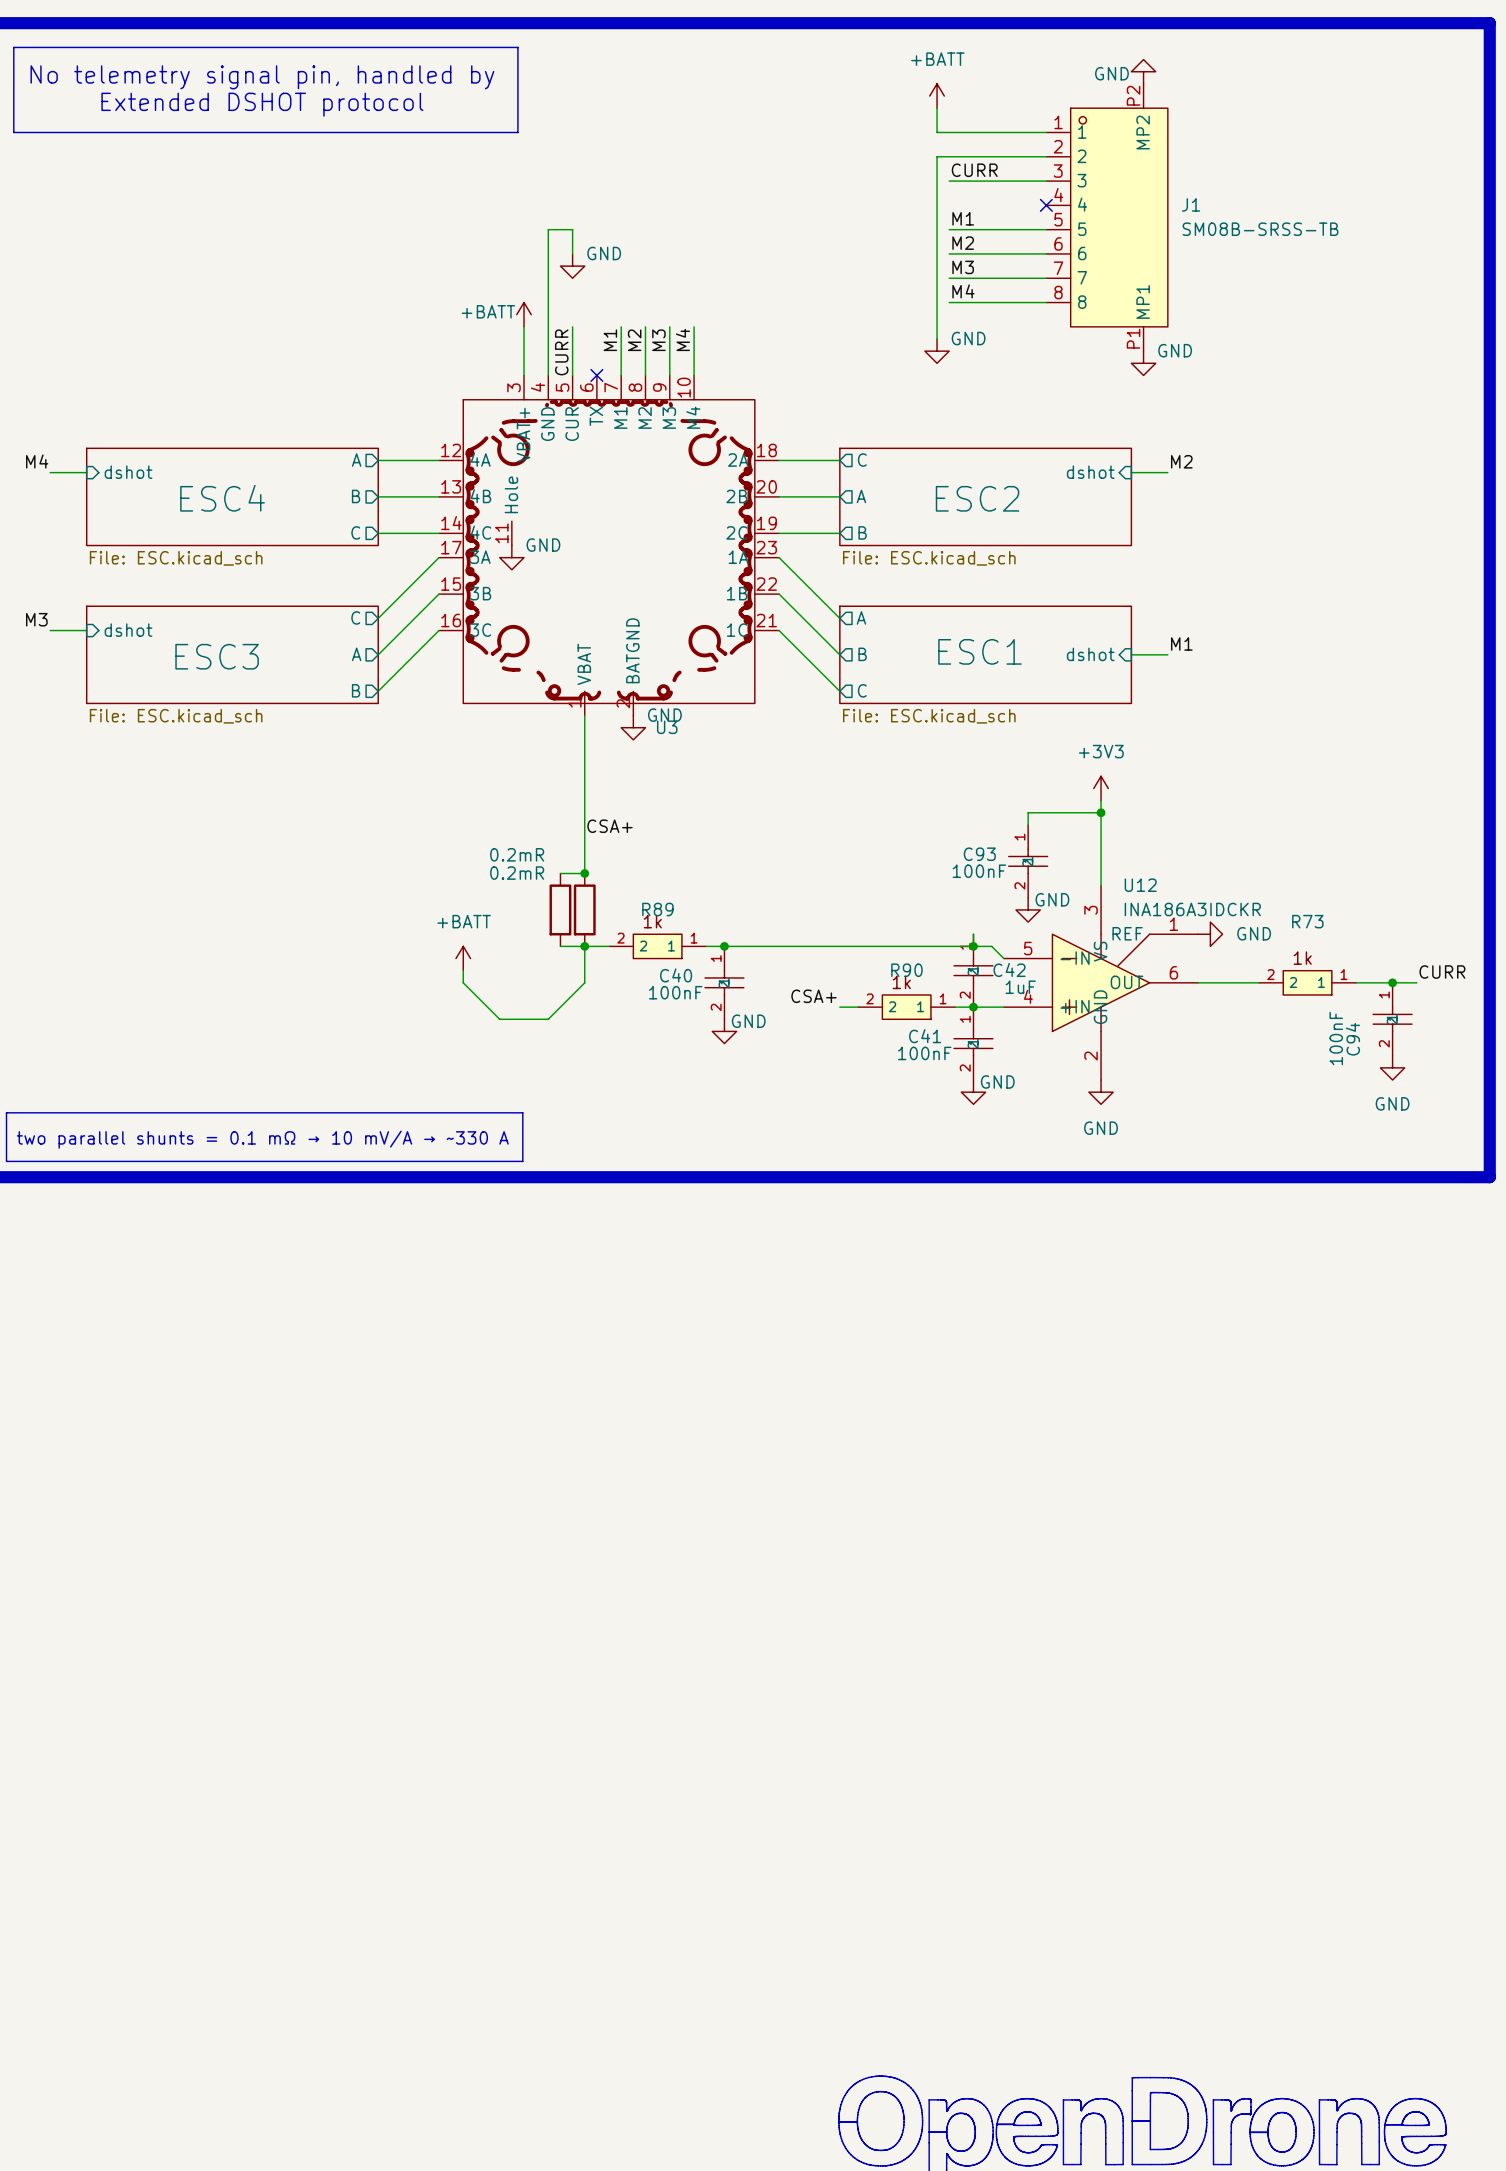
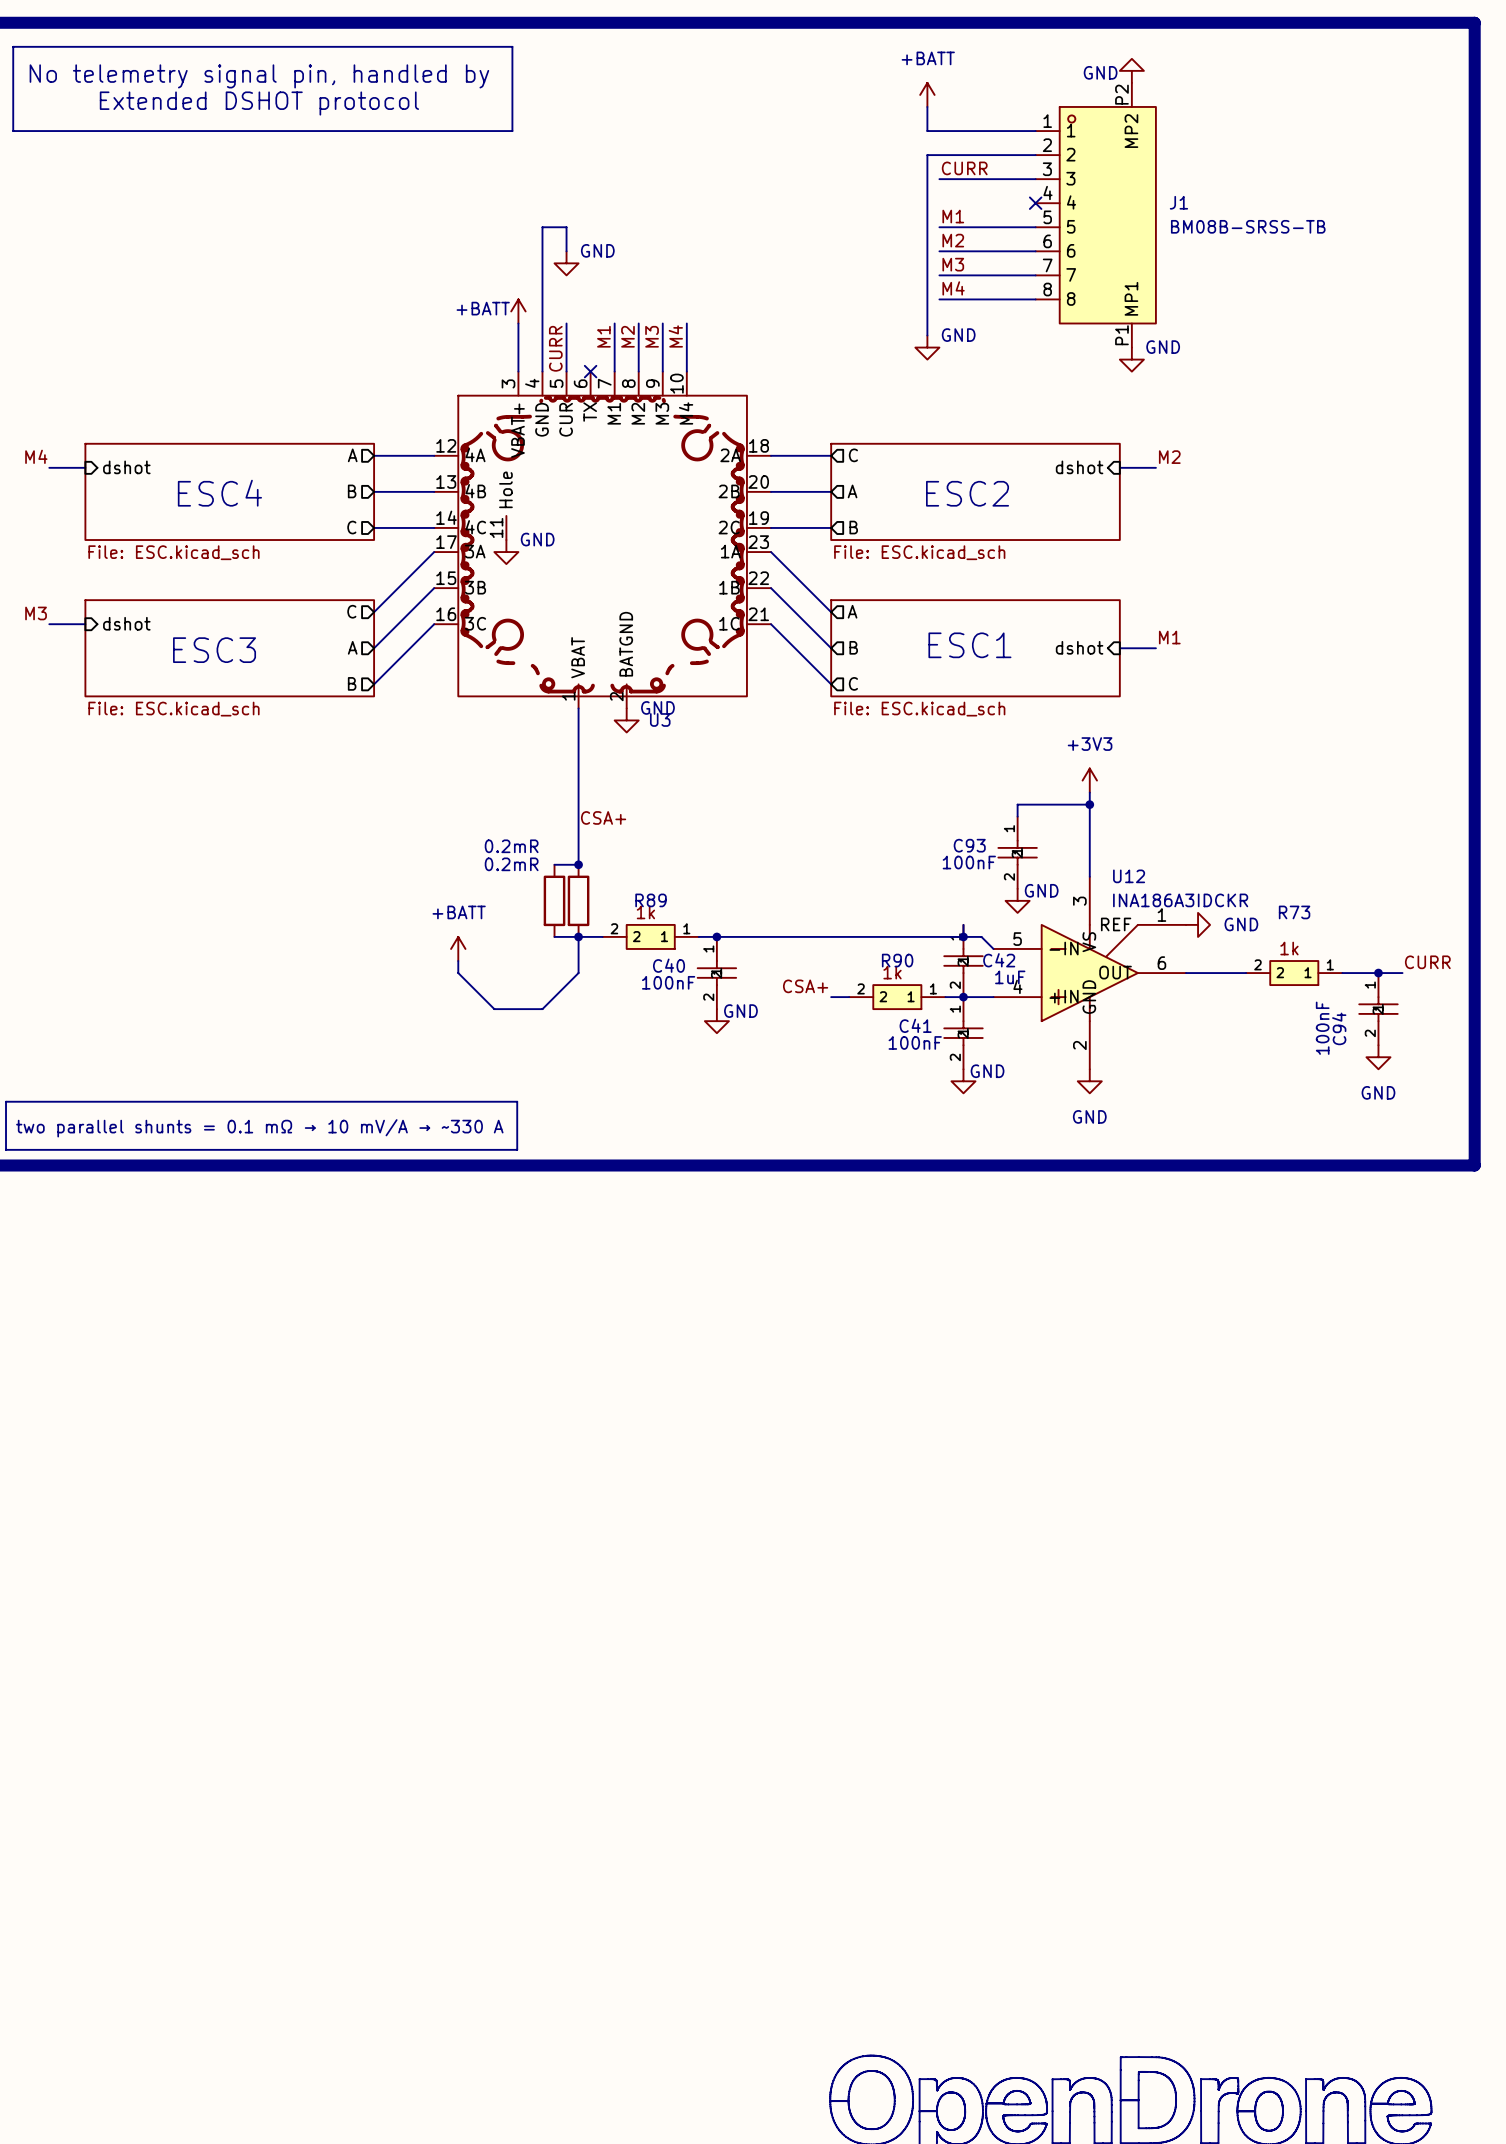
J1 value: SM08B-SRSS-TB (1260, 229) -> BM08B-SRSS-TB (1248, 226)

